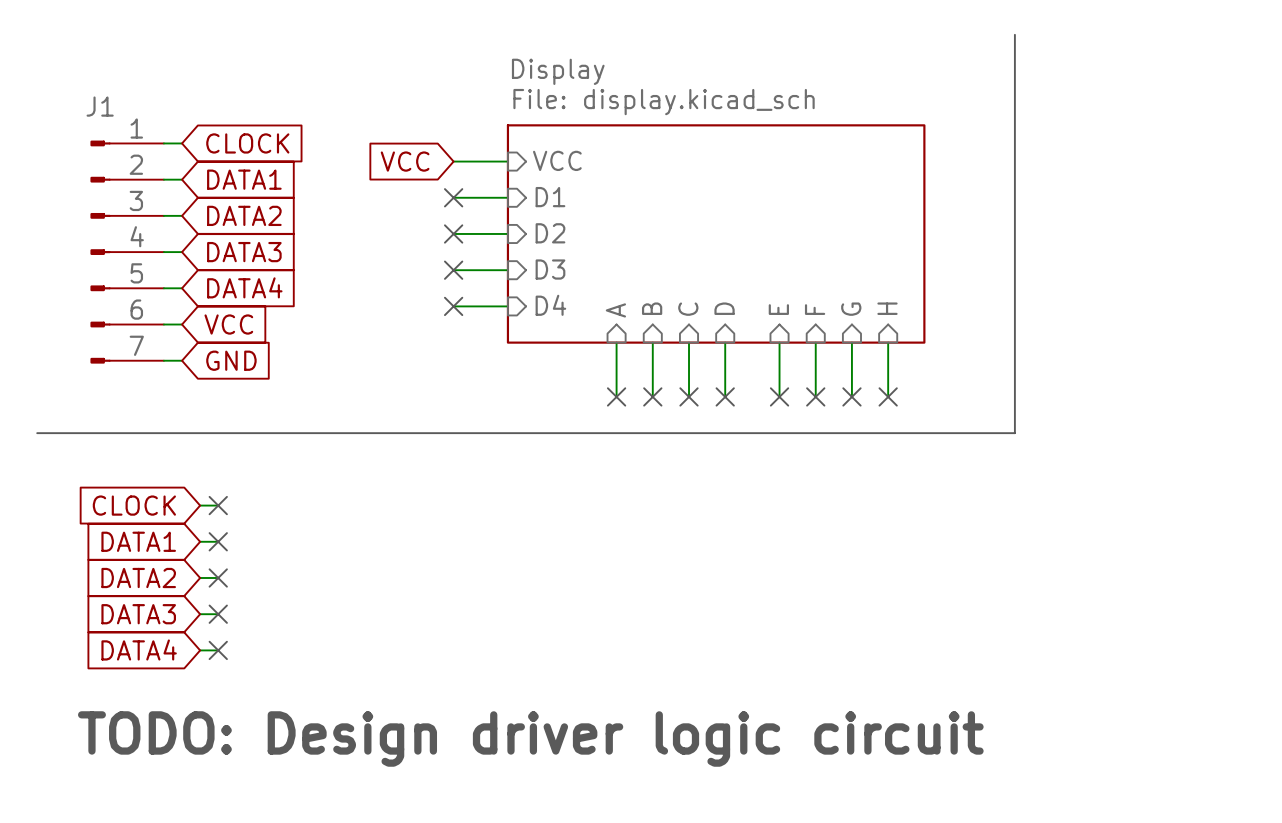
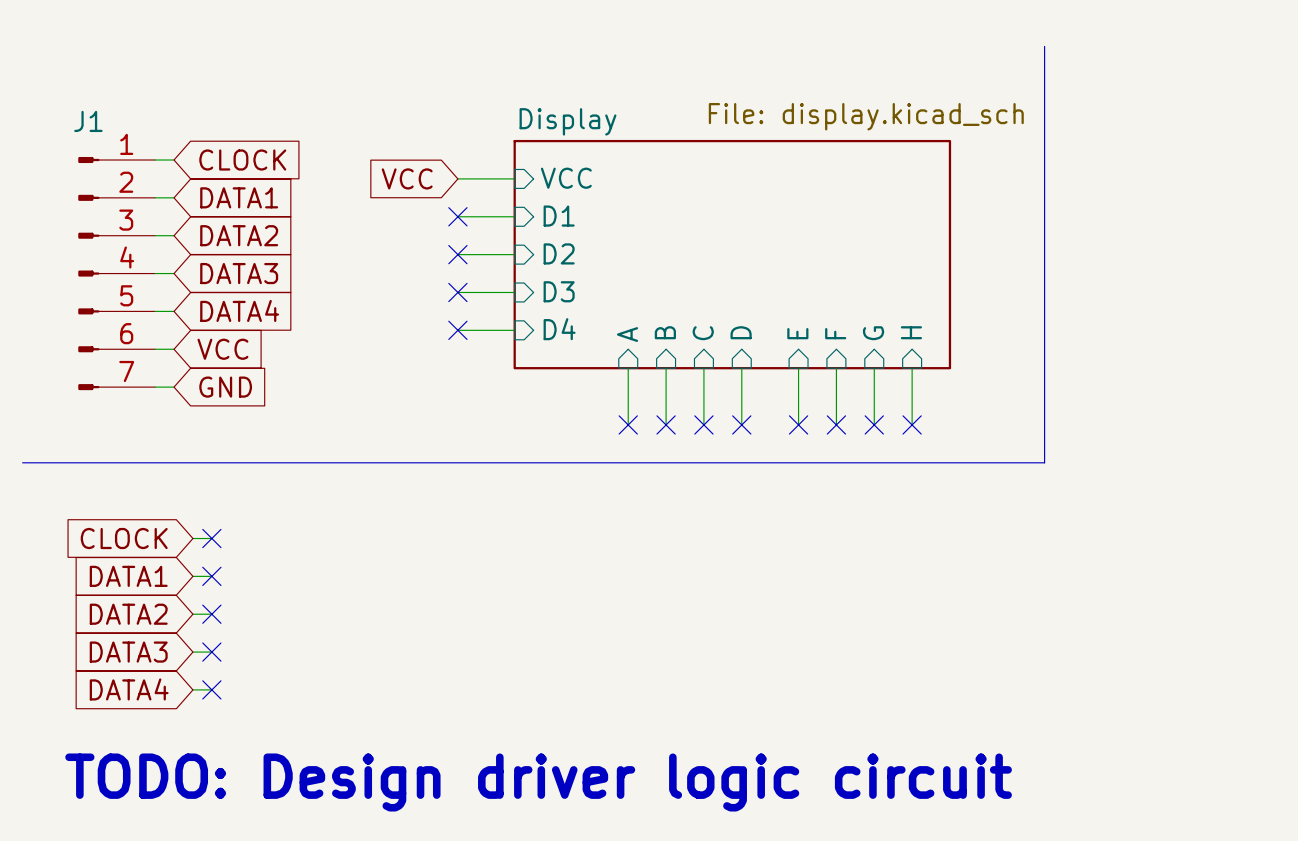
sheet Display name position: Display (558, 71) -> Display (567, 121)
sheet Display value position: File: display.kicad_sch (664, 102) -> File: display.kicad_sch (866, 116)

